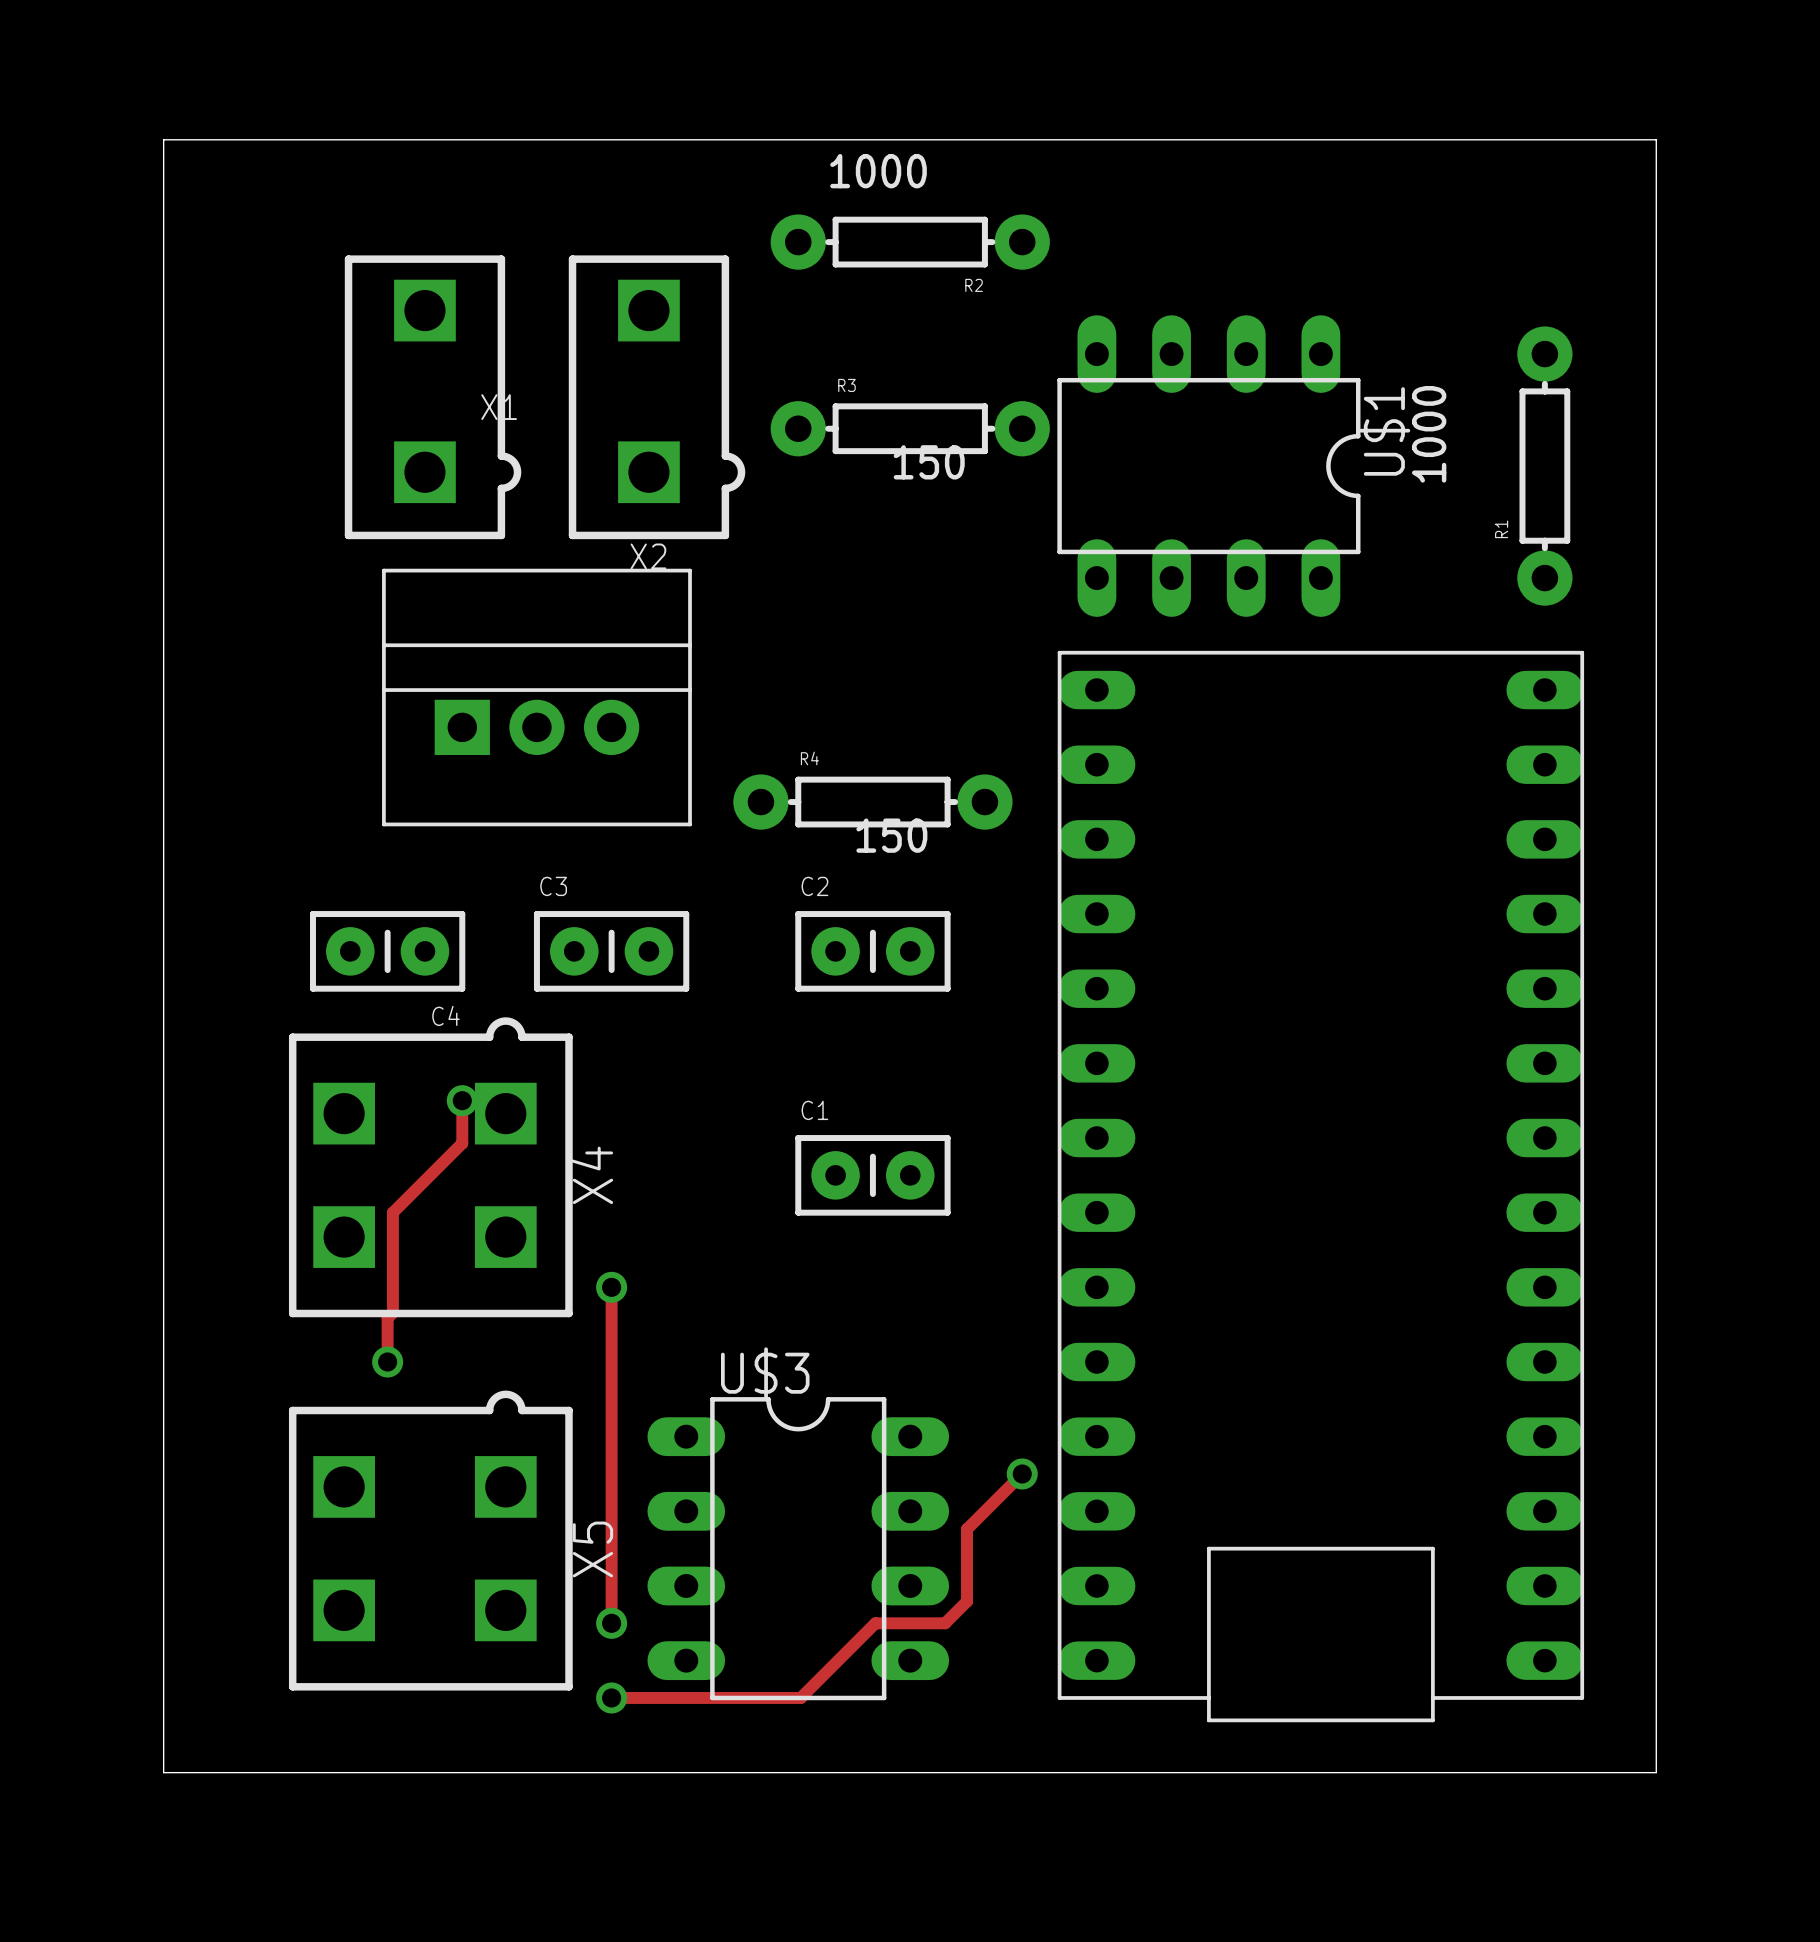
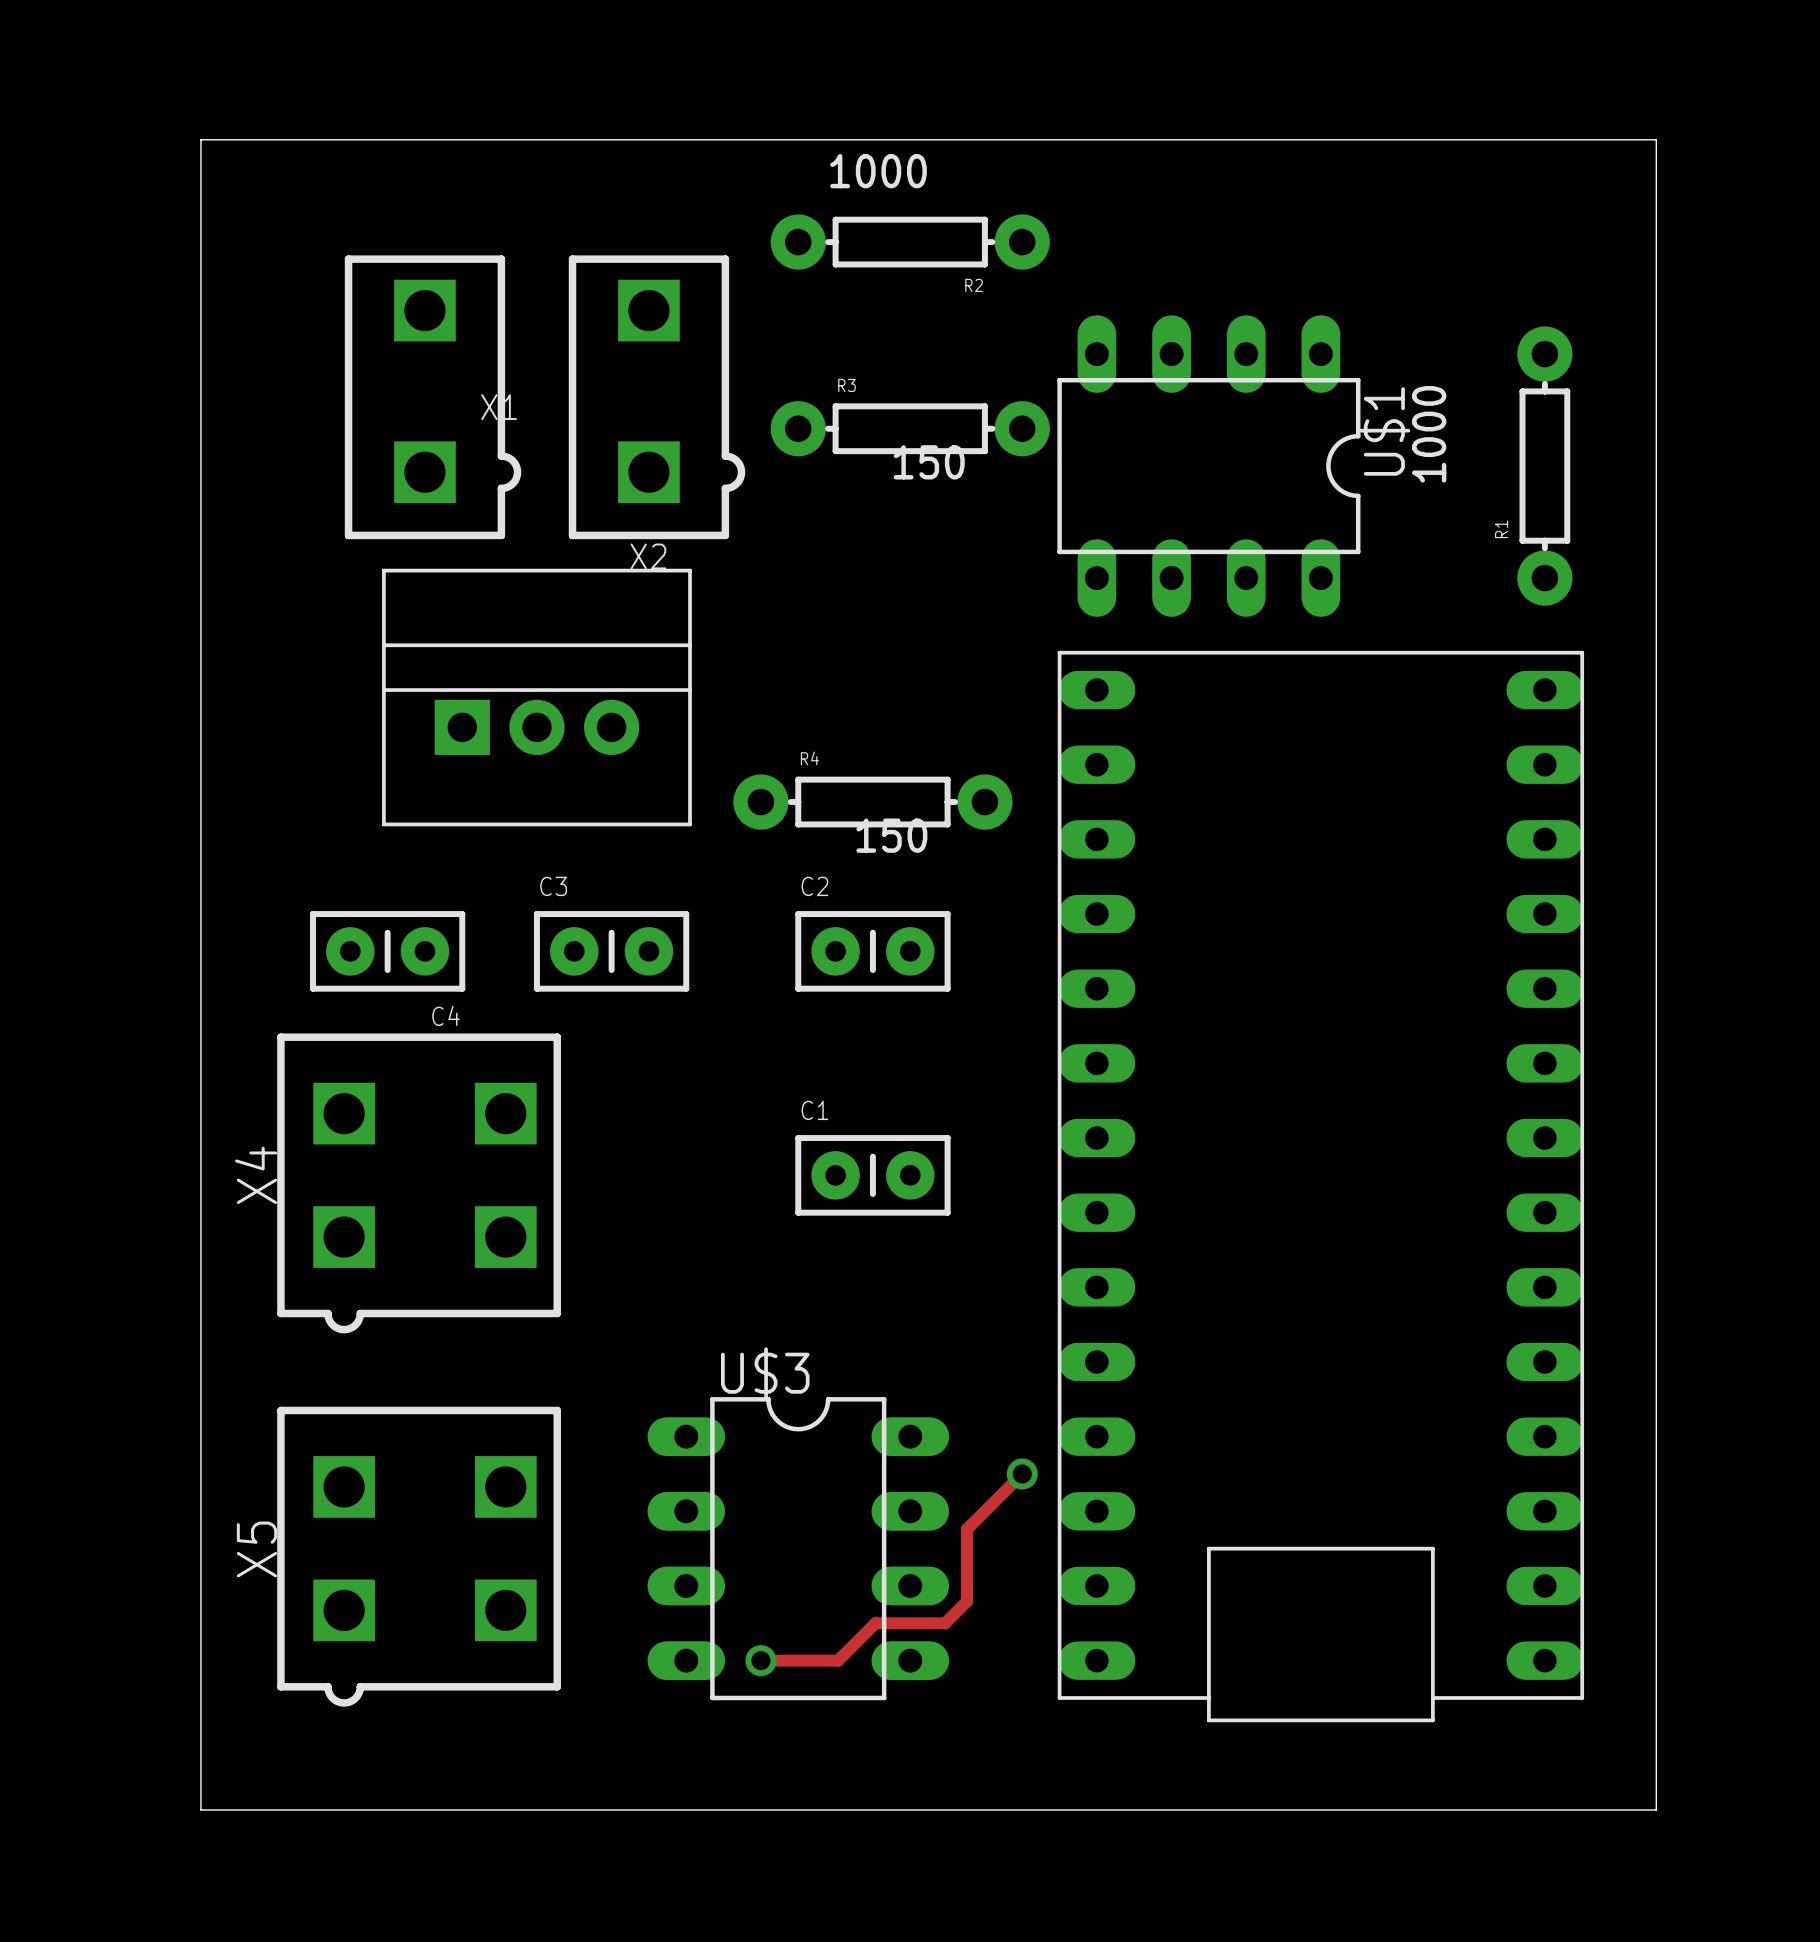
board edge: (200, 139) (163, 139) (163, 1772) (1656, 1772) -> (200, 139) (200, 1809) (1656, 1809) (1656, 1772)
track: (462, 1100) (462, 1143) (392, 1212) (392, 1312) (387, 1317) (387, 1362) -> none
via: (462, 1100) -> none
X4 rotation: 0° (430, 1167) -> 180° (419, 1183)
track: (611, 1287) (611, 1623) -> none
via: (611, 1287) -> none
via: (387, 1362) -> none
X5 rotation: 0° (430, 1540) -> 180° (419, 1556)
via: (611, 1623) -> none
via: none -> (760, 1660)
track: (838, 1660) (800, 1697) (611, 1697) -> (838, 1660) (760, 1660)
via: (611, 1697) -> none

